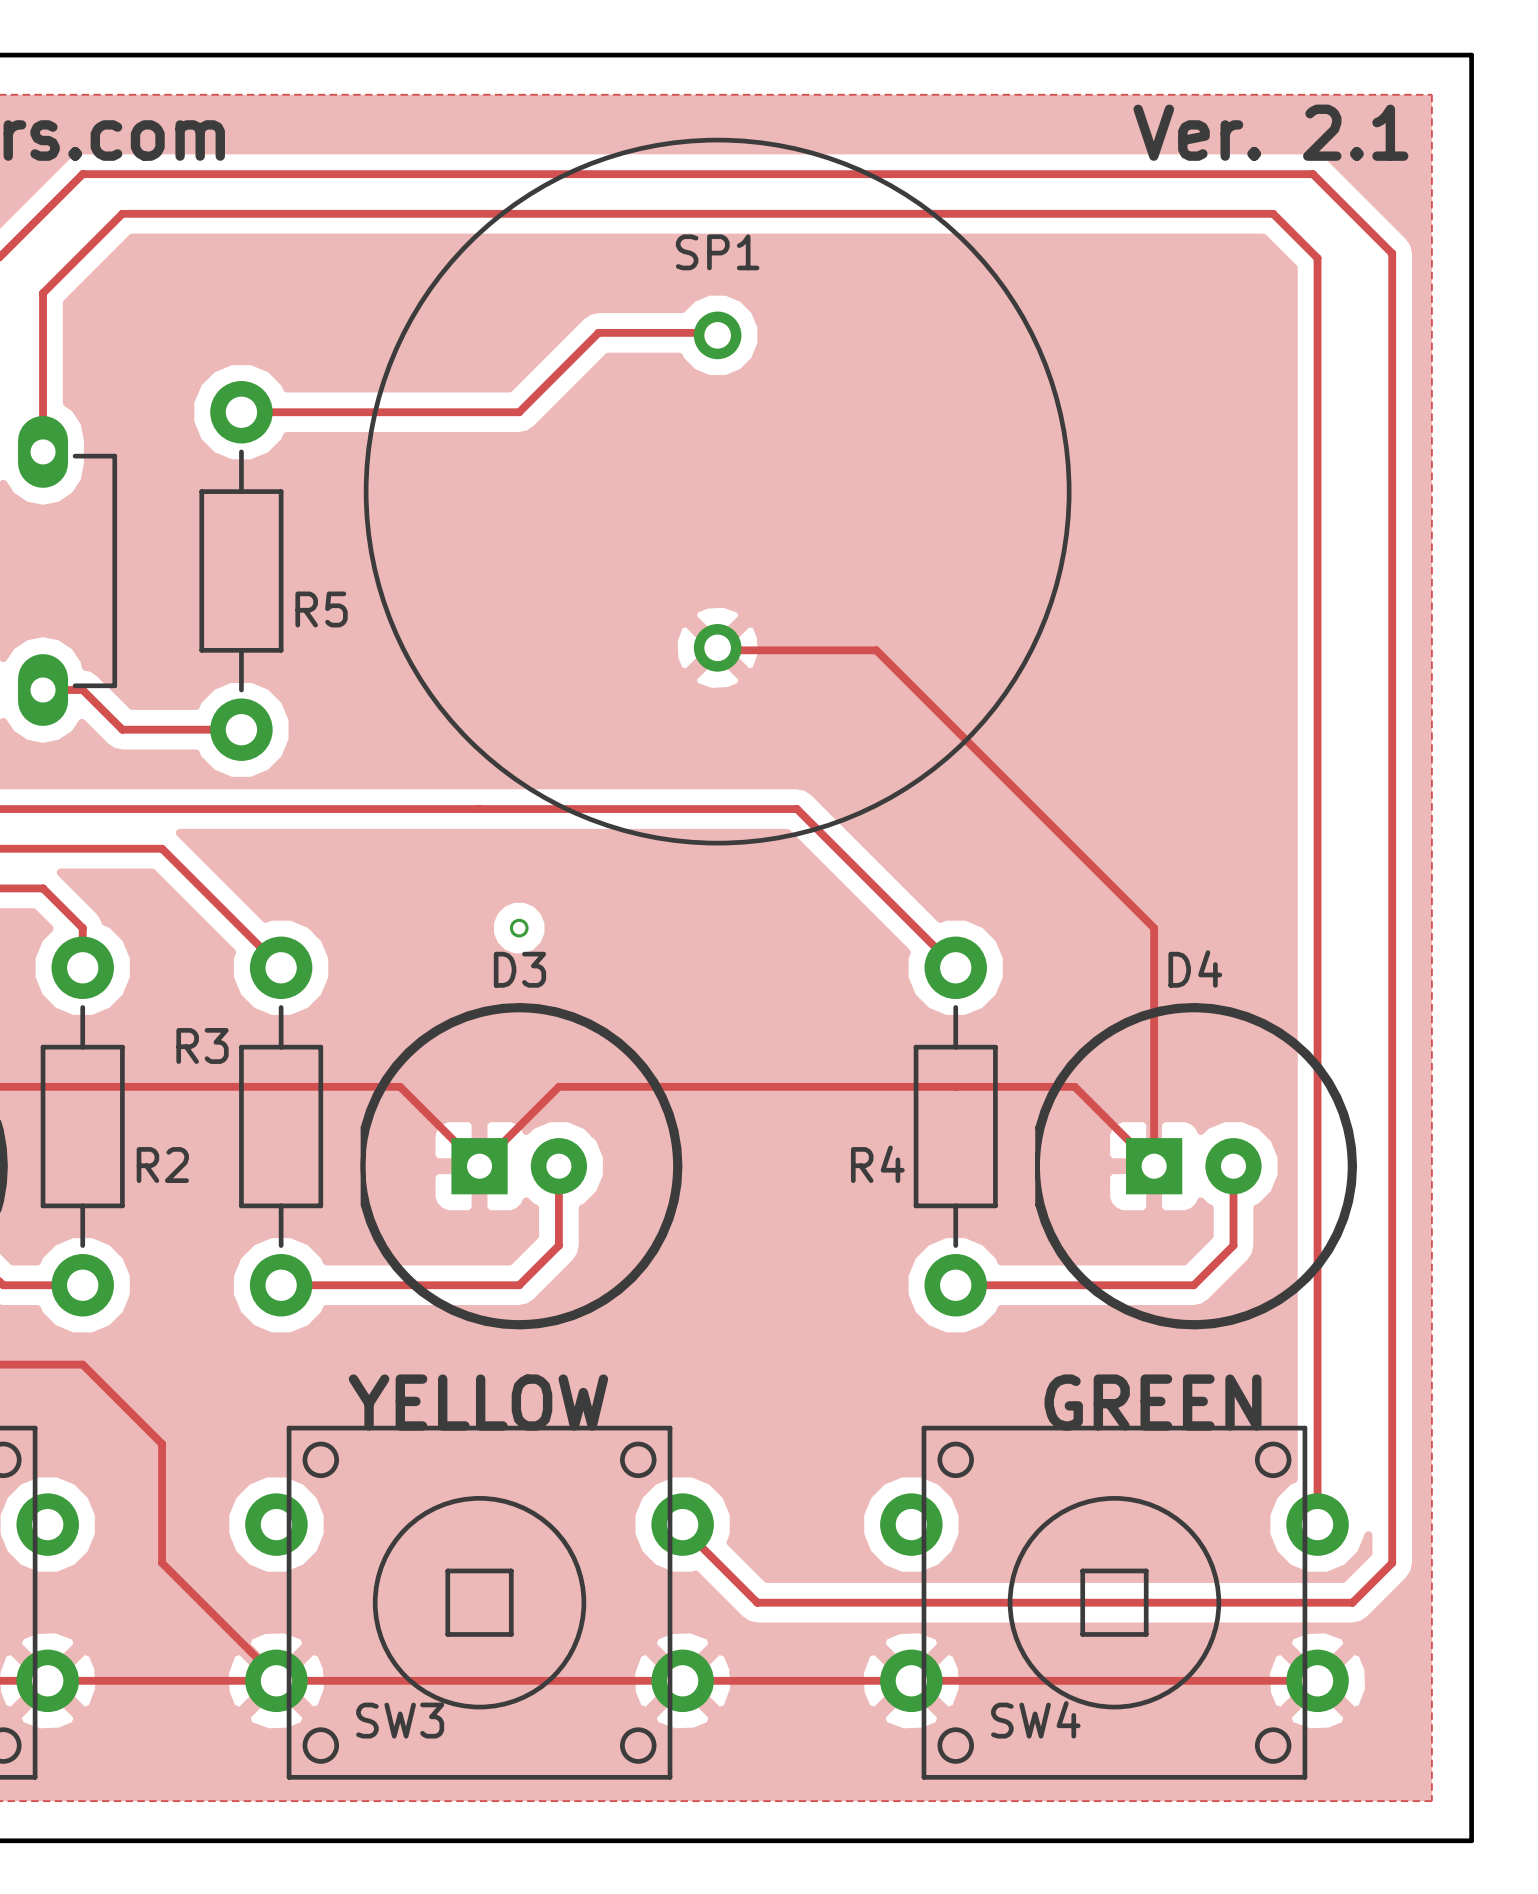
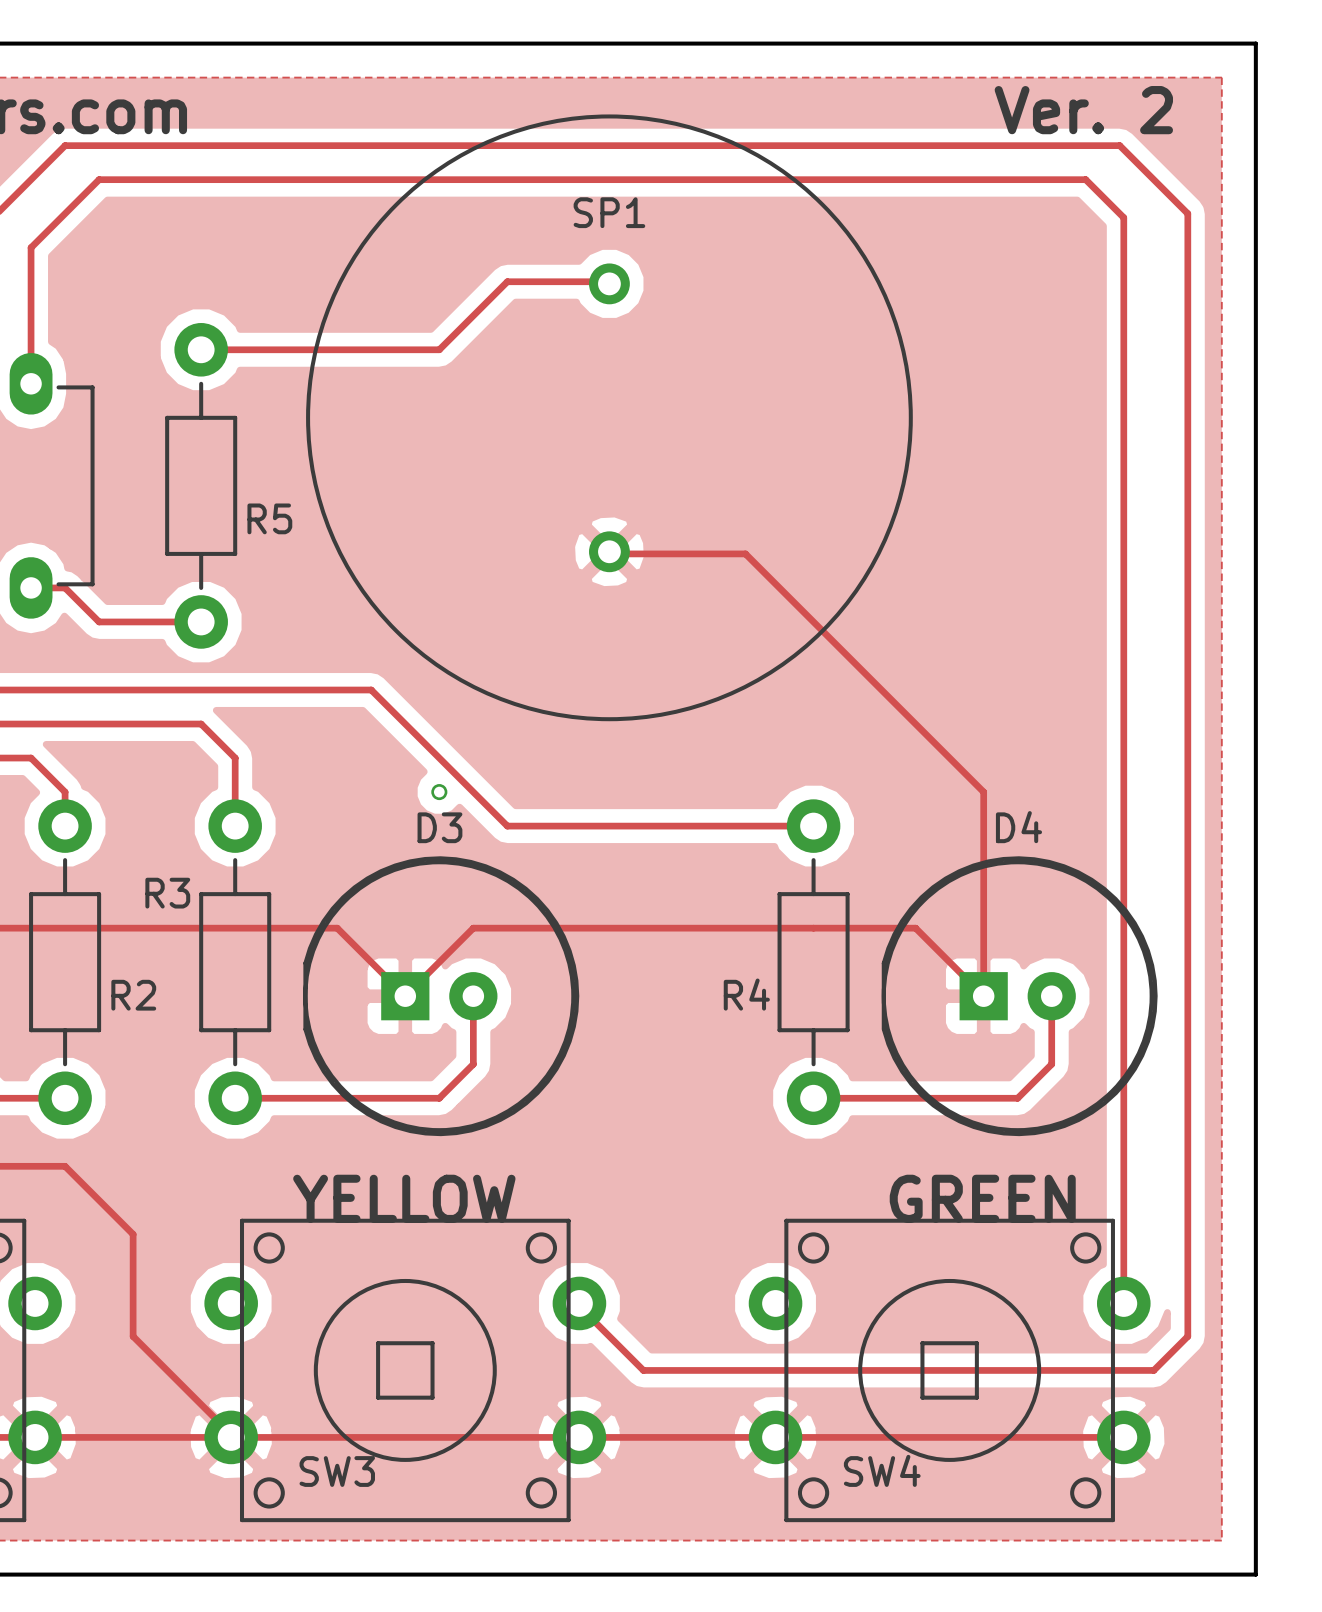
text: Ver. 2.1 (1270, 132) -> Ver. 2 (1083, 110)
track: (439, 809) (796, 809) (955, 967) -> (371, 690) (507, 826) (813, 826)
track: (162, 848) (281, 967) -> (133, 724) (201, 724) (235, 758) (235, 826)

